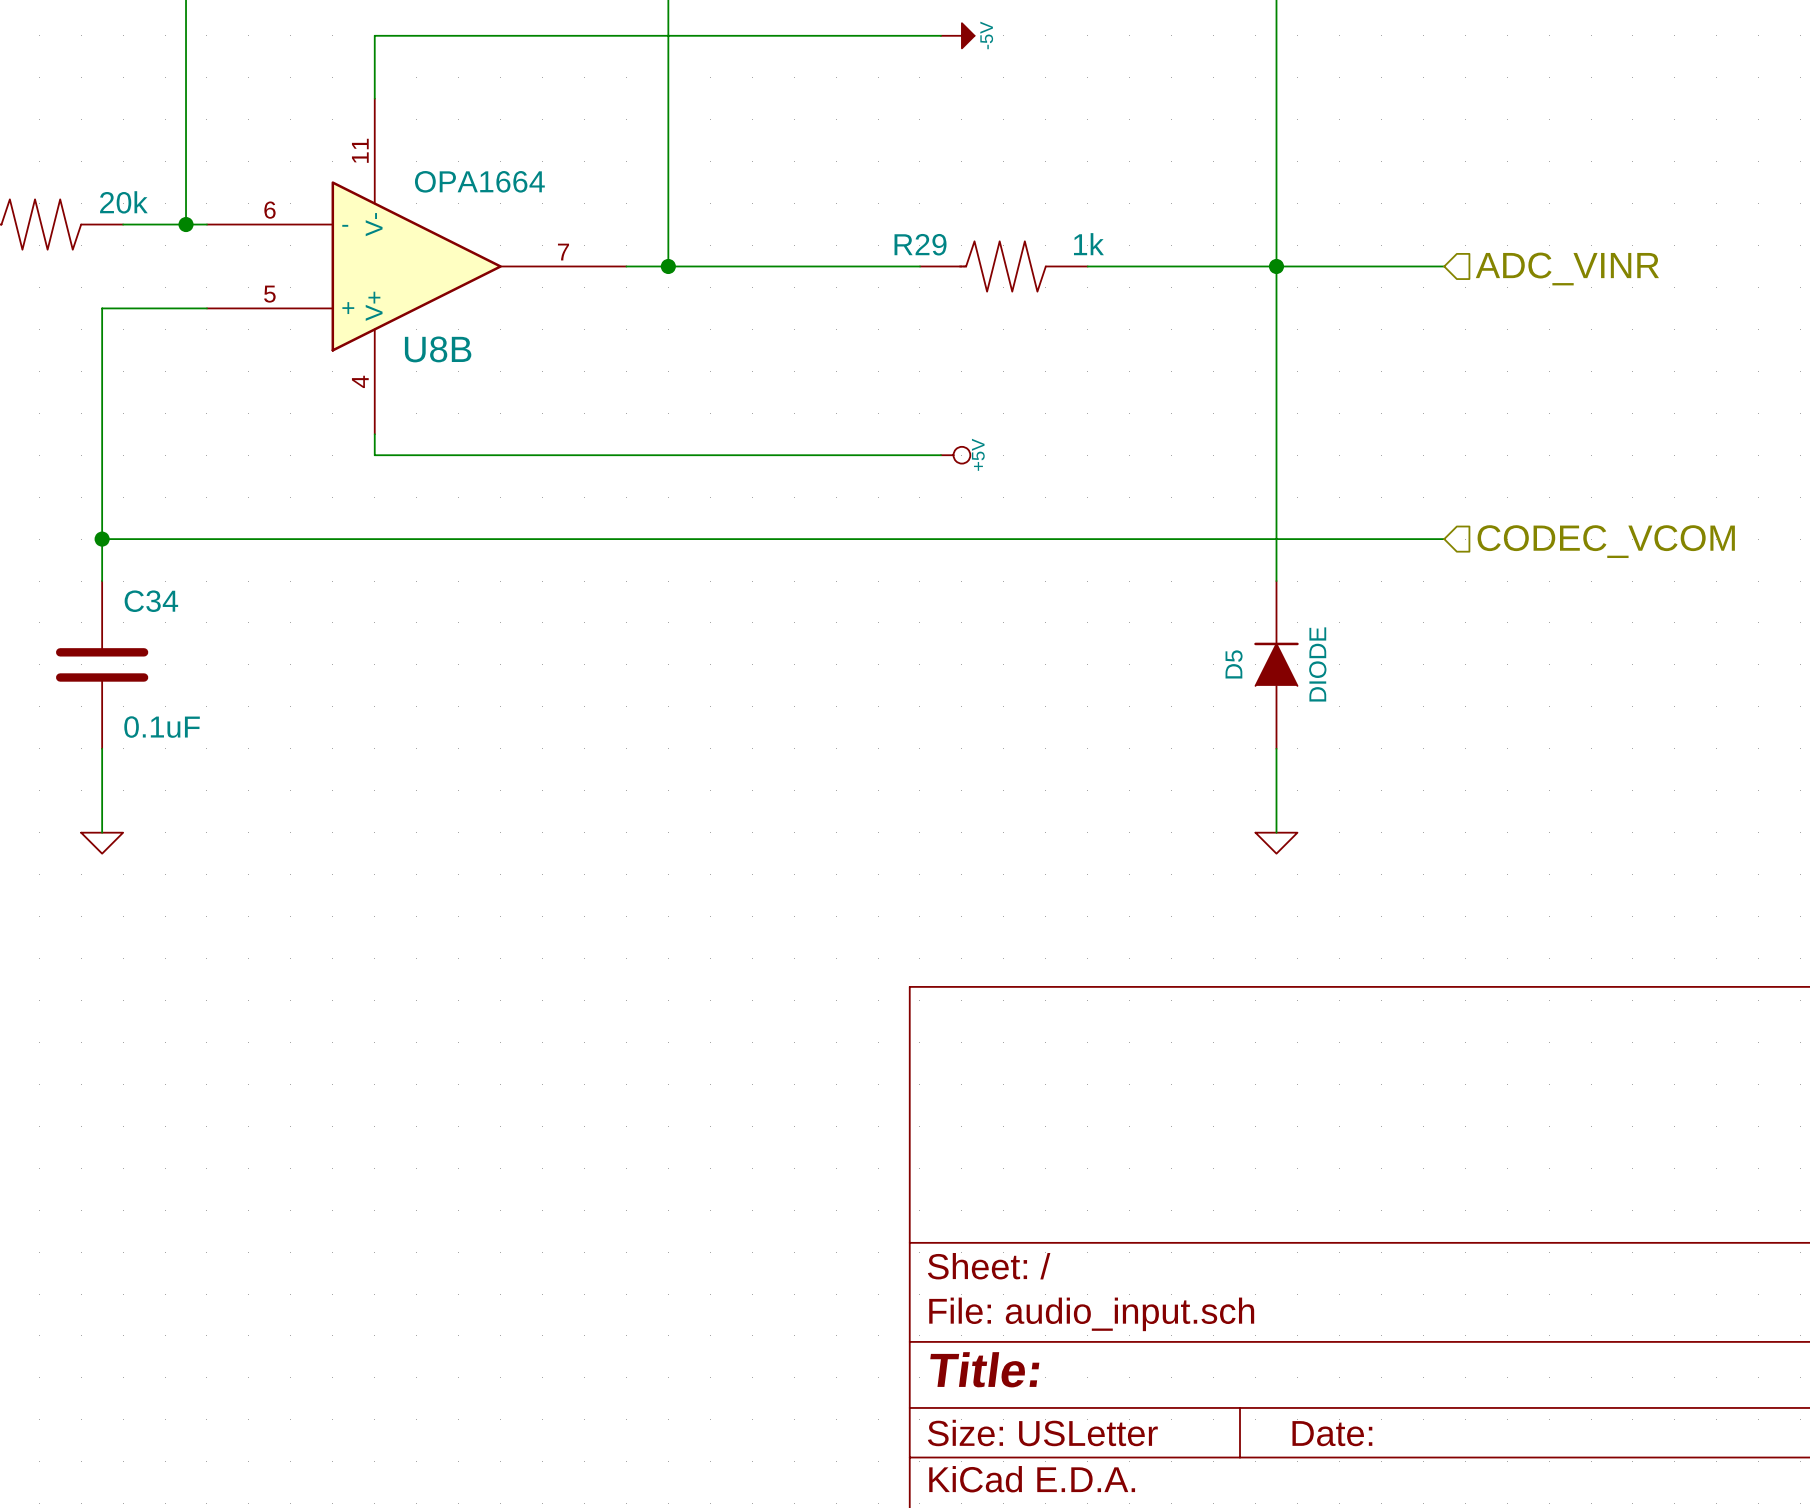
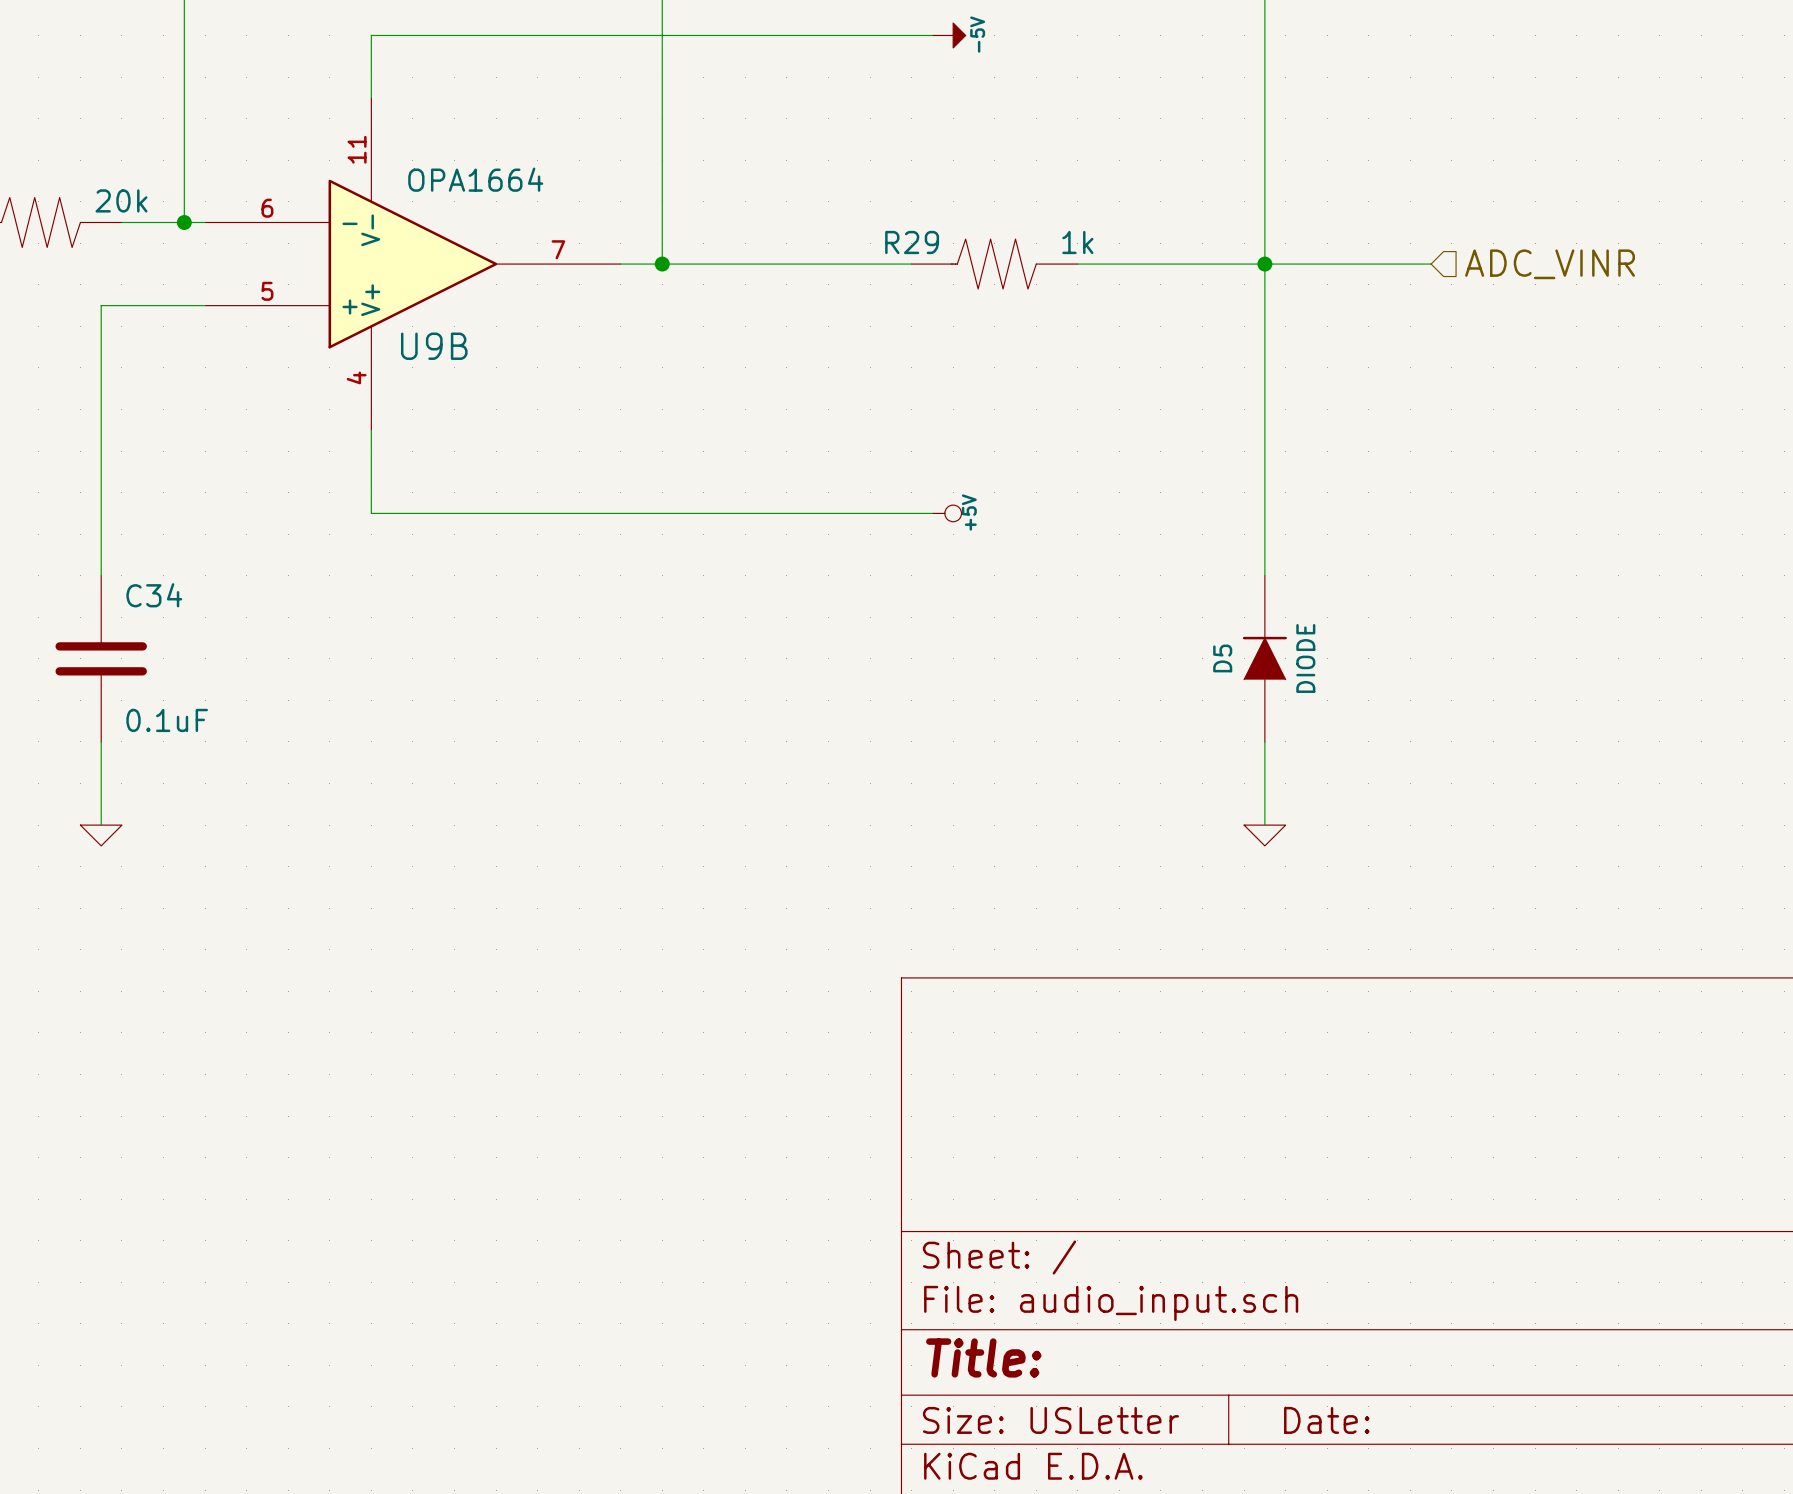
U8B name: U8B (438, 349) -> U9B (434, 346)
wire: (374, 455) (940, 455) -> (371, 451) (371, 513) (932, 513)
power symbol position: +5V (955, 455) -> +5V (946, 513)
wire: (102, 539) (1444, 539) -> none
junction: (102, 539) -> none
hierarchical label: CODEC_VCOM (1606, 541) -> none

